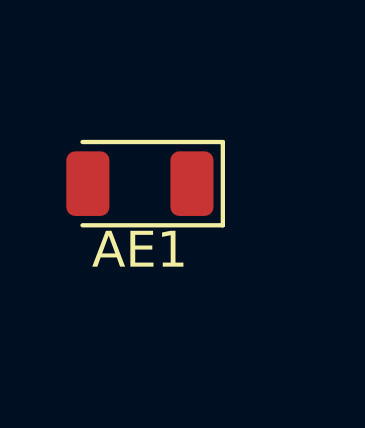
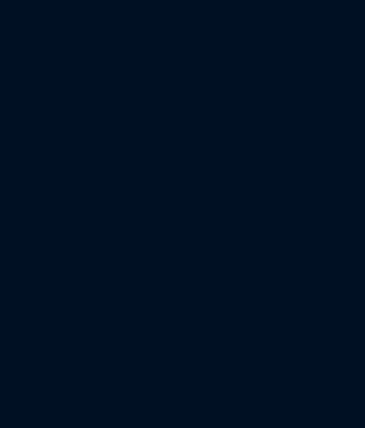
AE1: (145, 183) -> none

